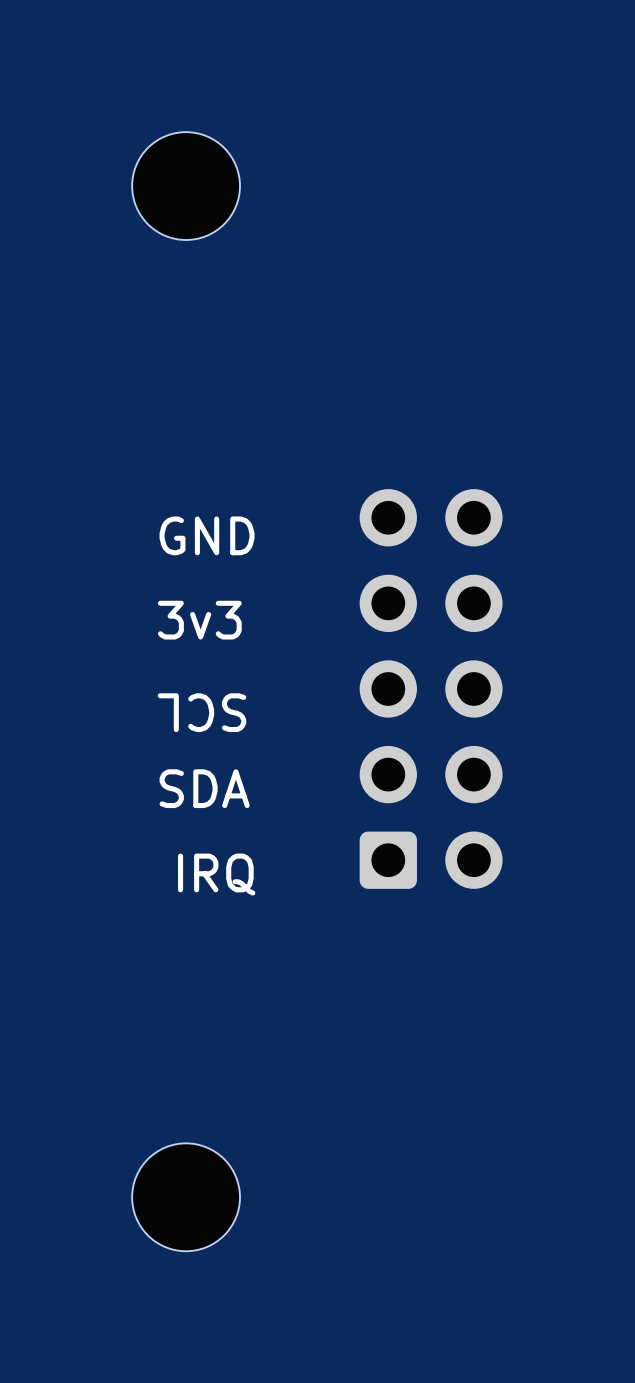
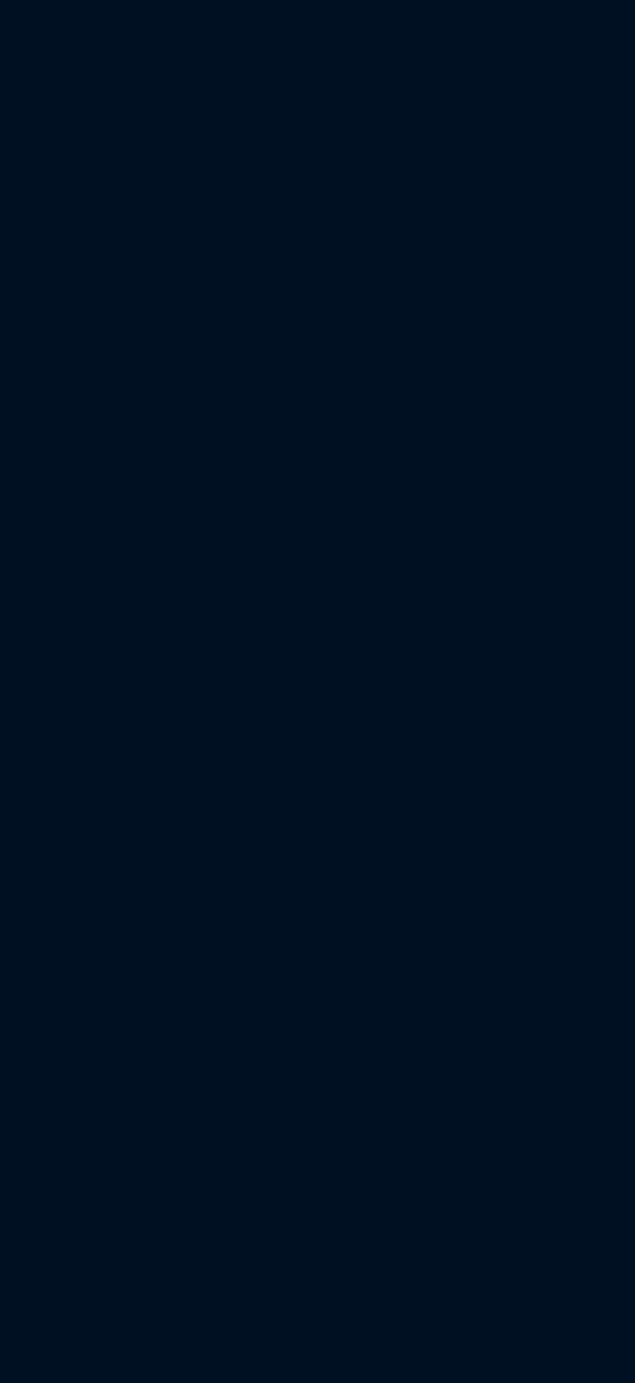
part: (186, 186) -> none
text: GND (207, 535) -> none
text: 3v3 (199, 620) -> none
part: (431, 688) -> none
text: SCL (202, 712) -> none
text: SDA (204, 788) -> none
text: IRQ (216, 874) -> none
part: (186, 1197) -> none

